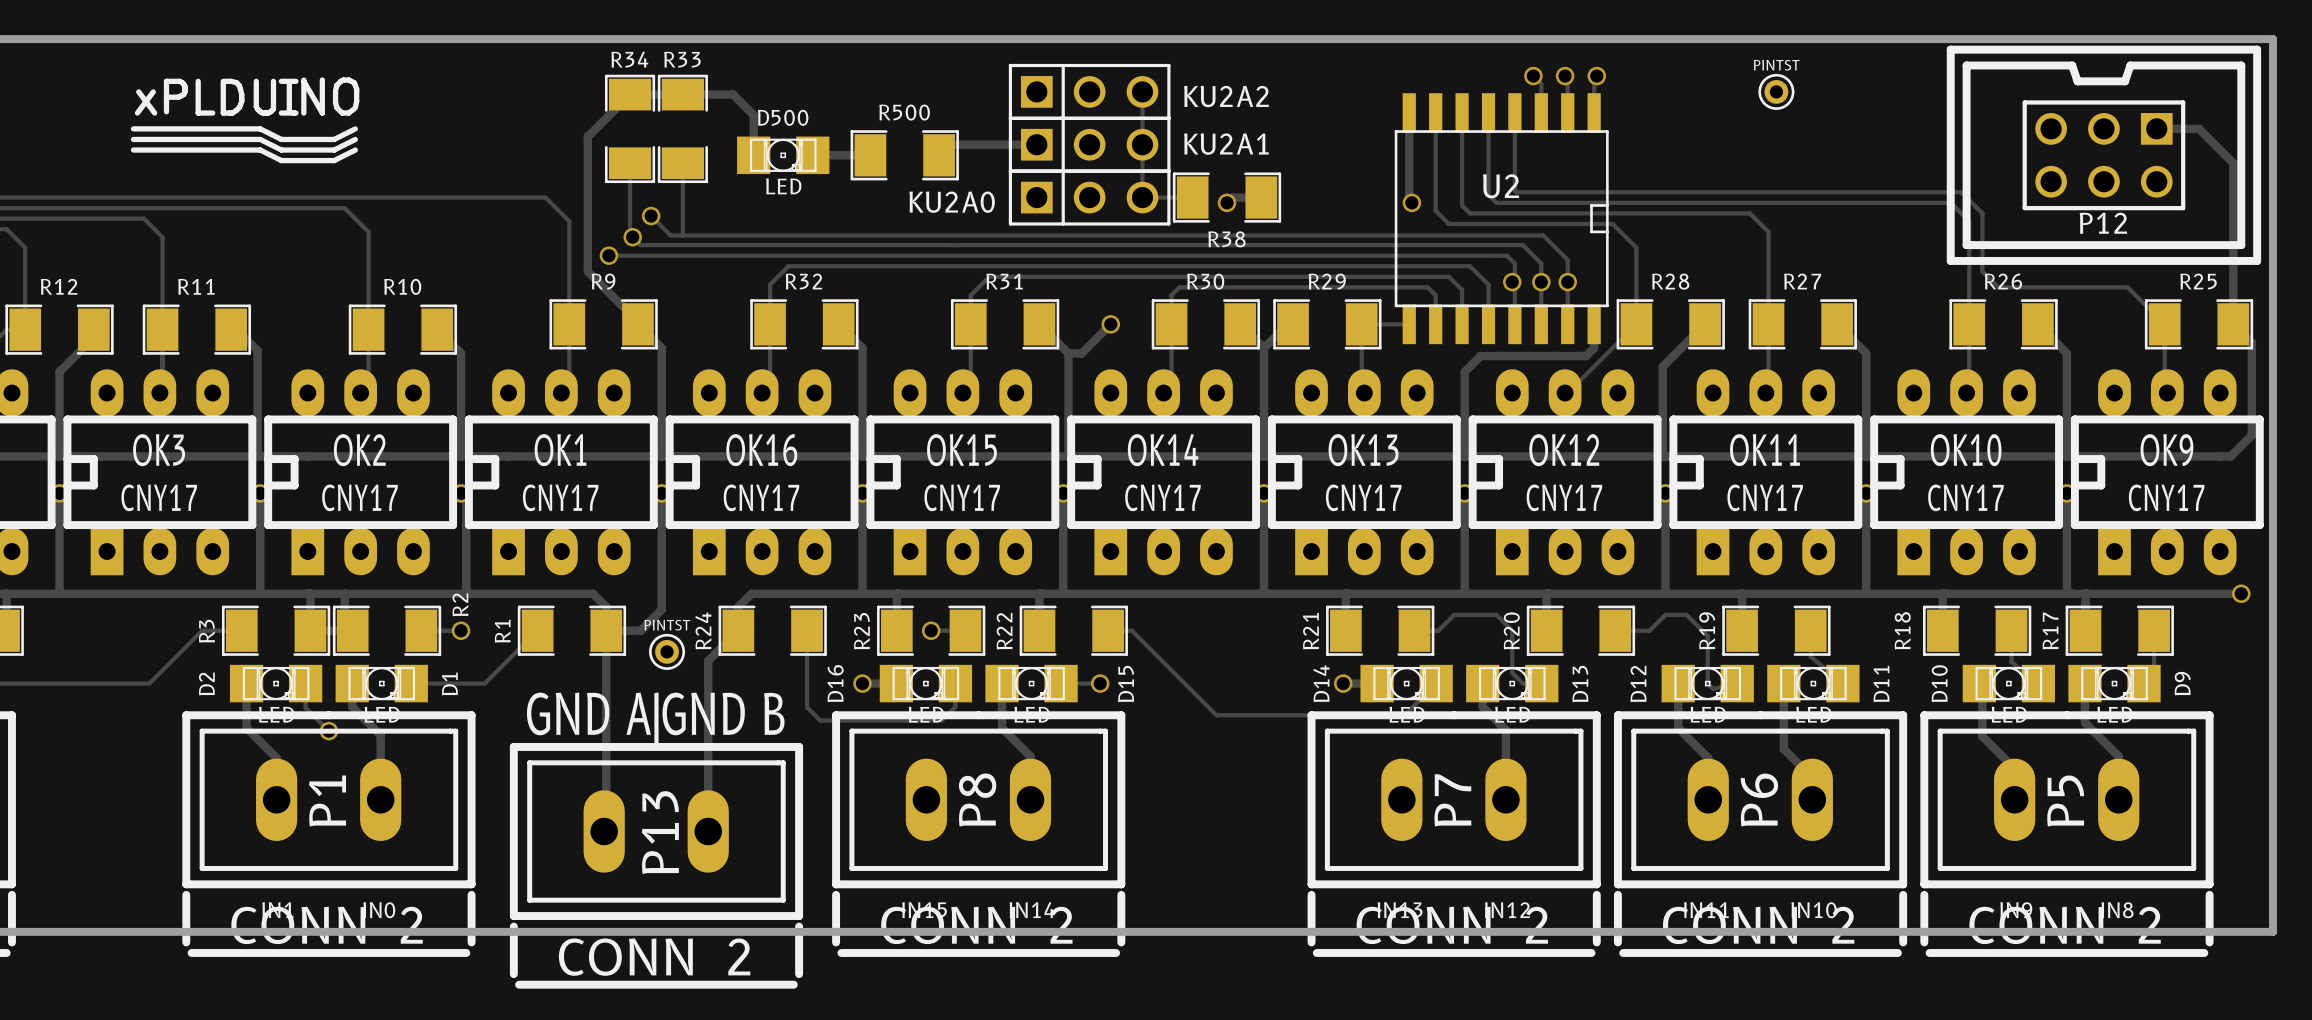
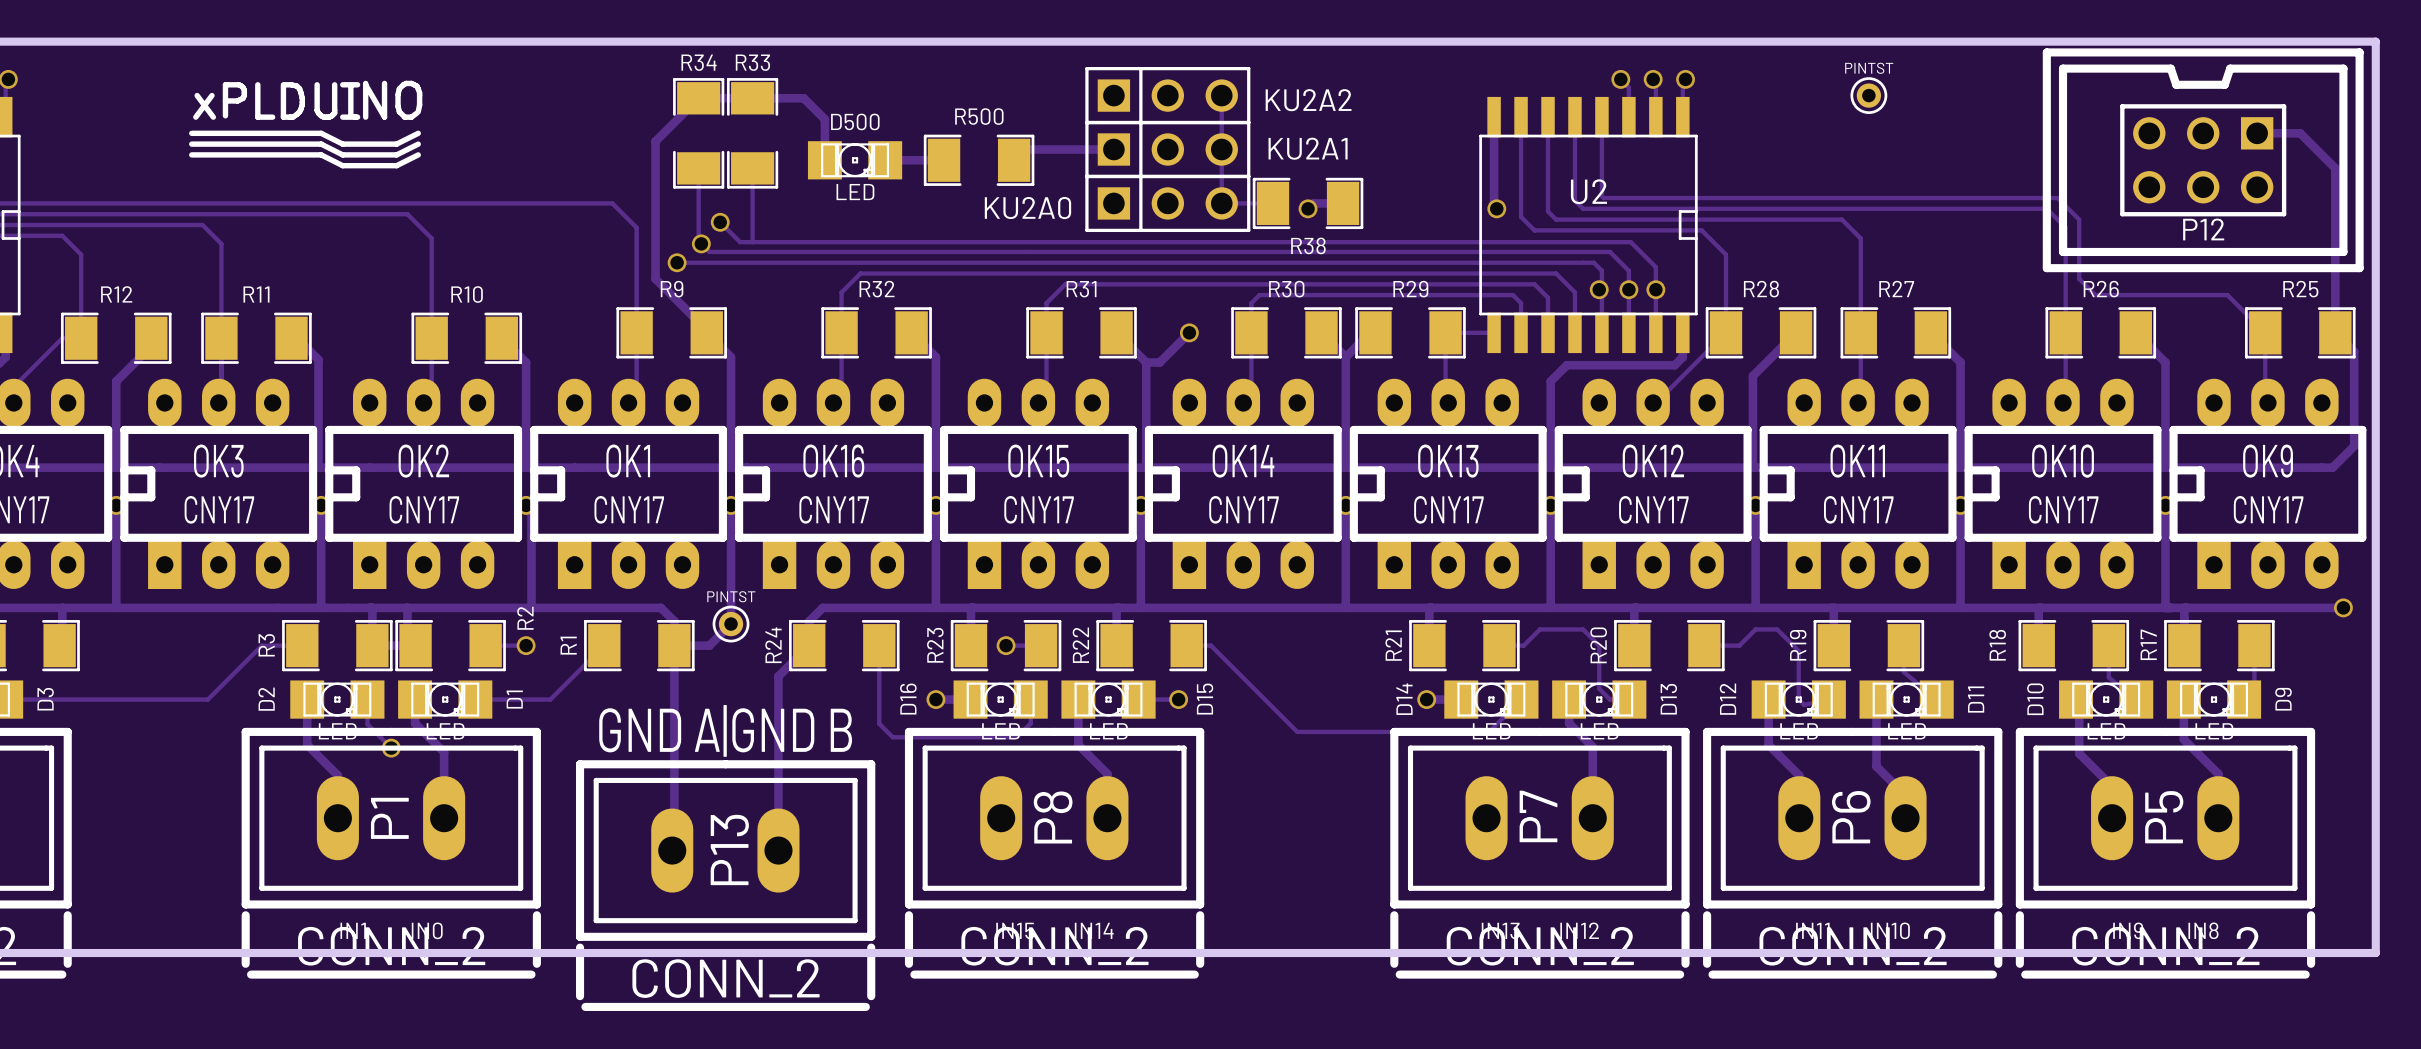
PINTST position: (667, 651) -> (731, 624)

